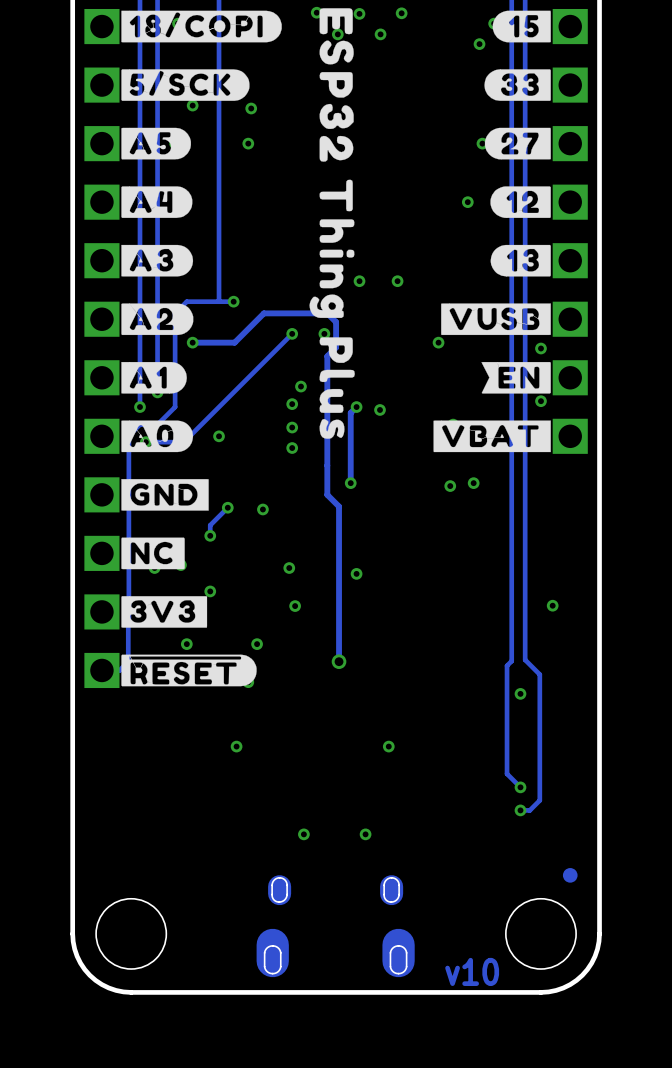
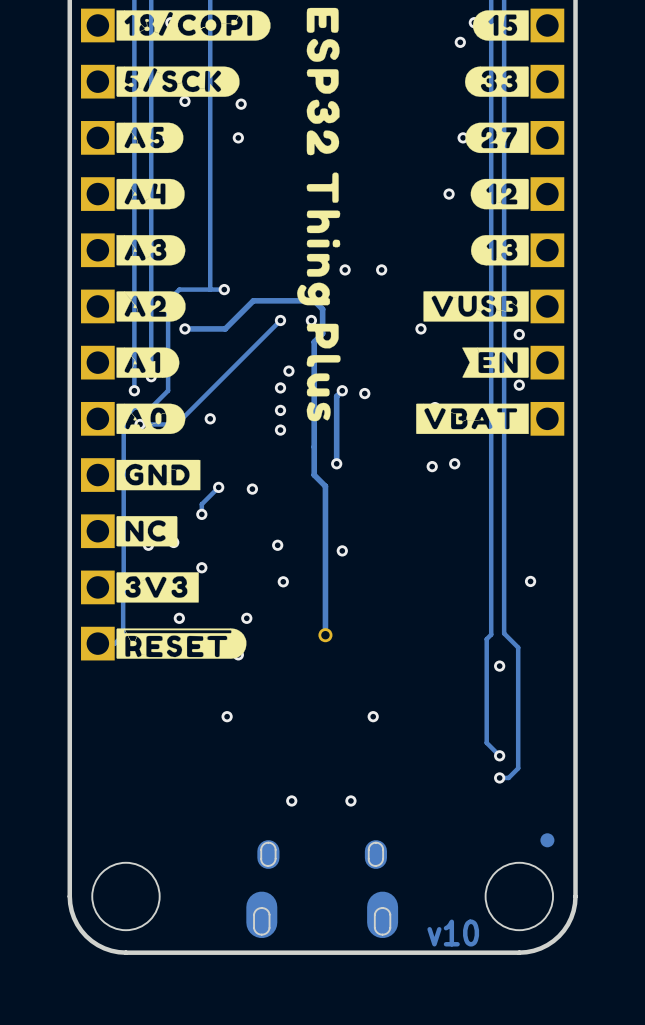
via: (316, 12) -> none
via: (359, 13) -> none
via: (401, 13) -> none
via: (337, 34) -> none
via: (380, 34) -> none

